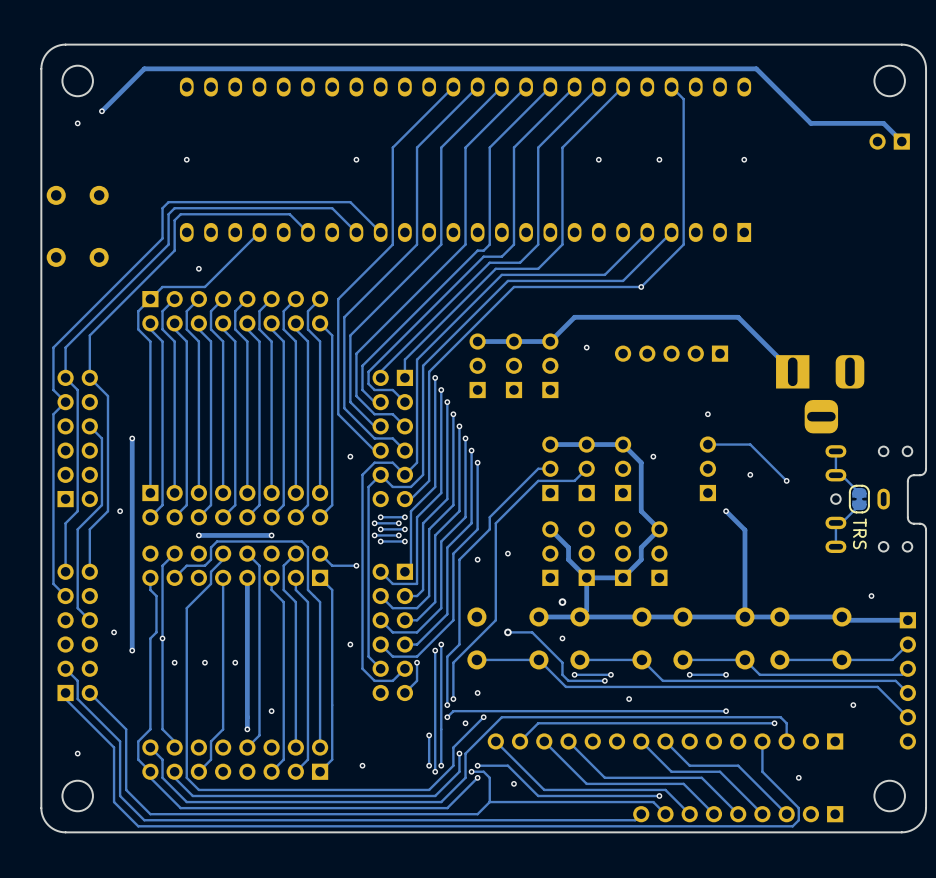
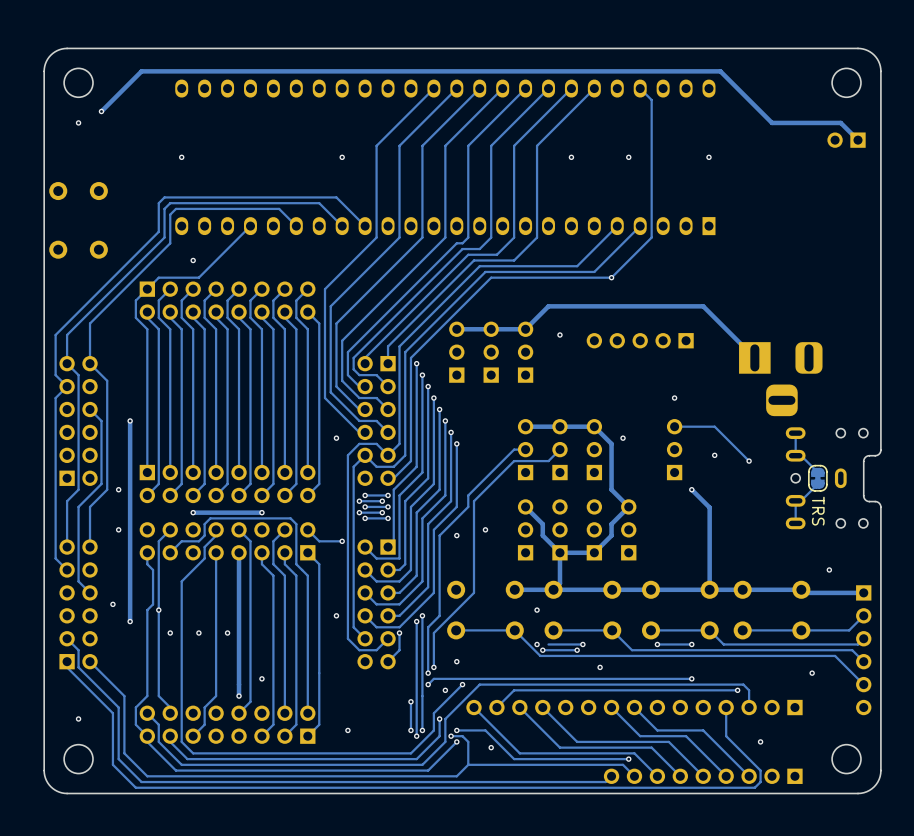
via: none -> (118, 529)
via: (562, 602) -> none
track: (507, 632) (532, 632) (562, 662) (562, 674) (568, 680) -> none
via: (507, 632) -> none
via: none -> (537, 644)
via: (574, 674) -> none
via: none -> (542, 650)

